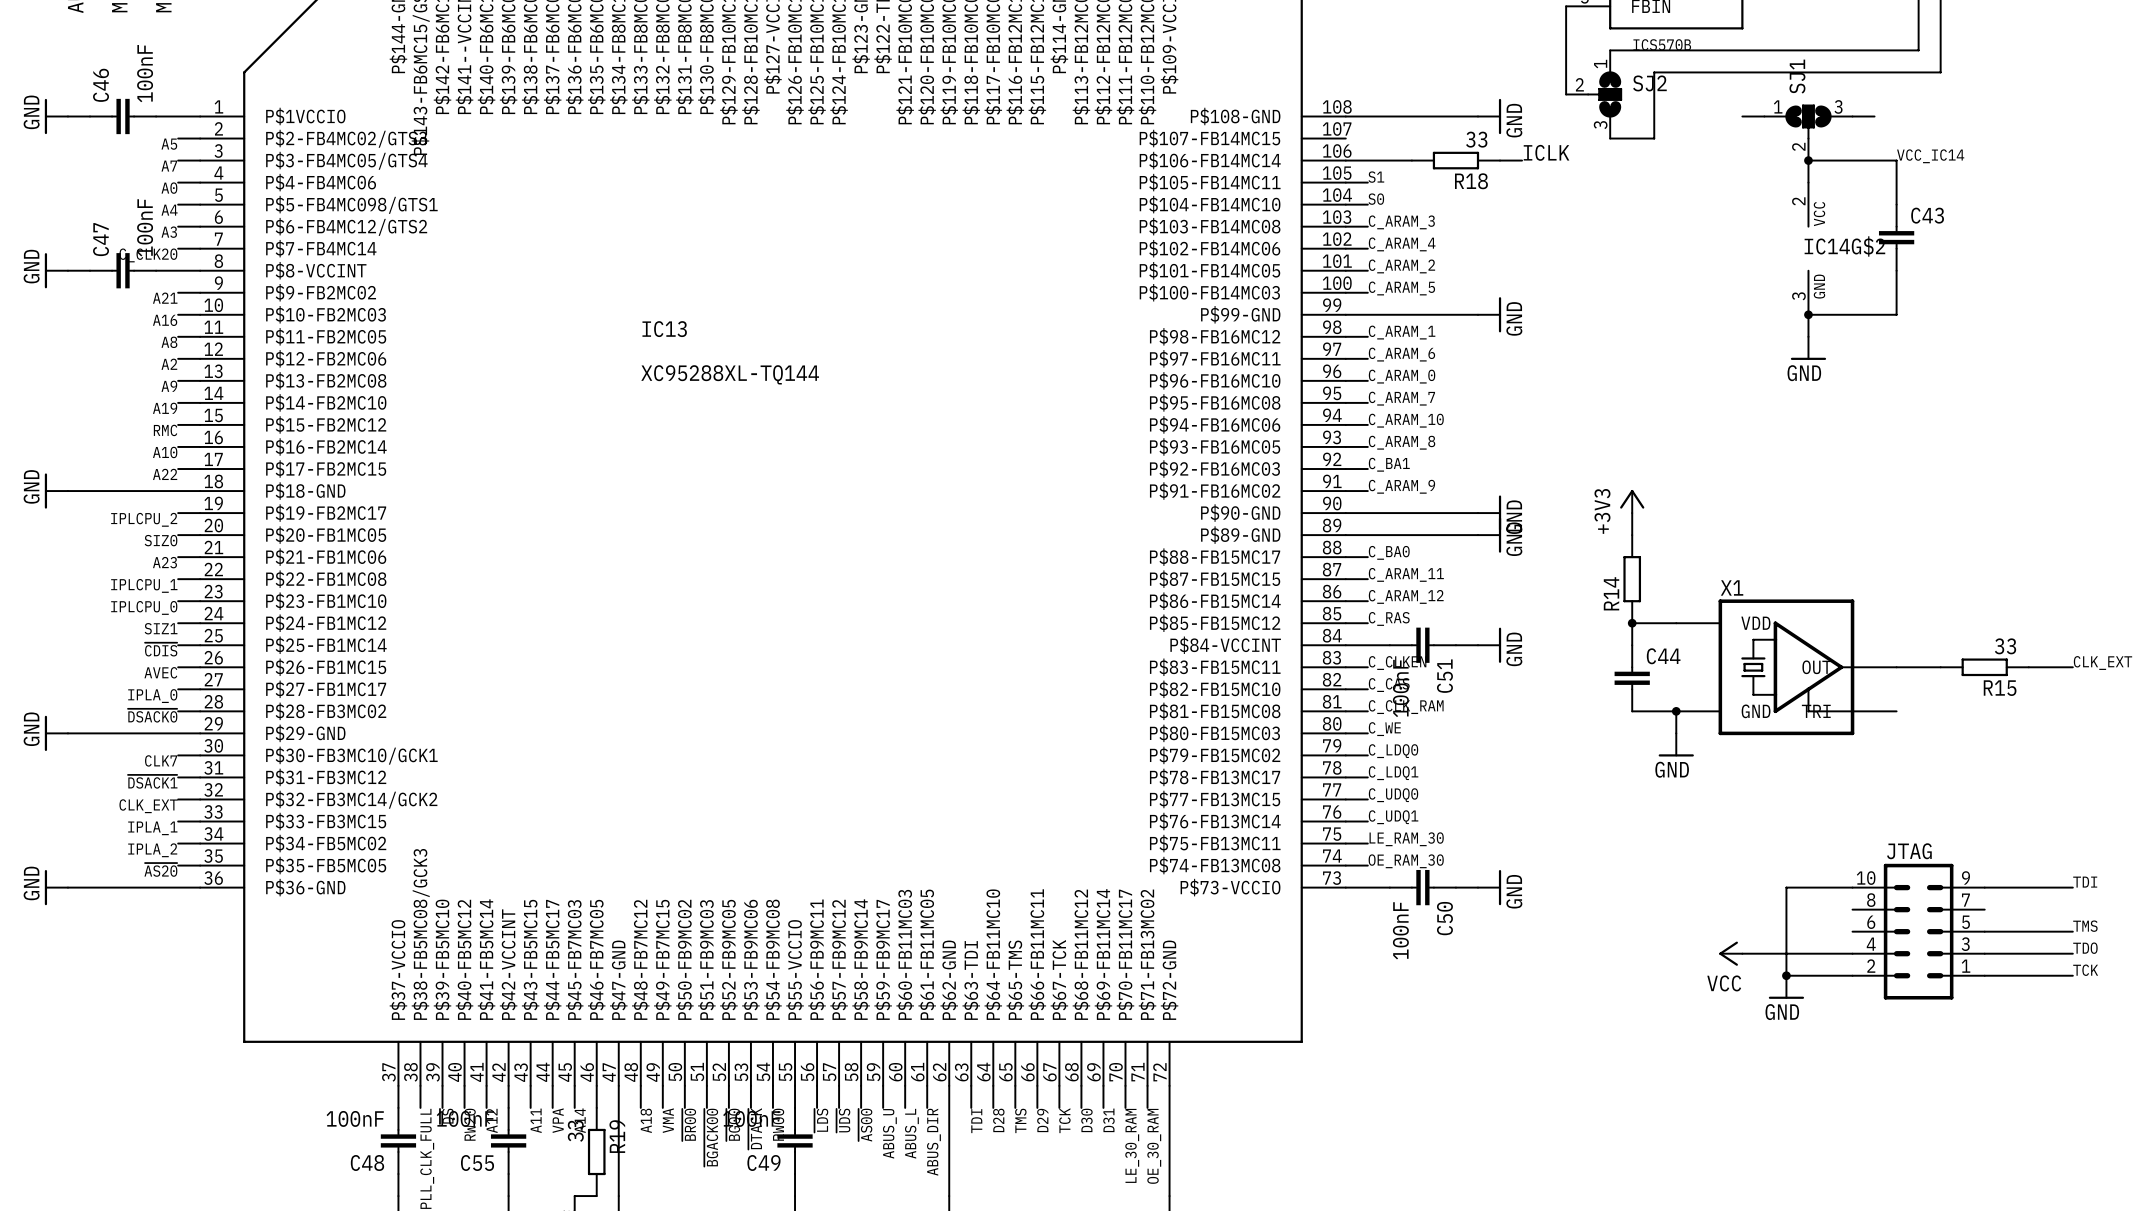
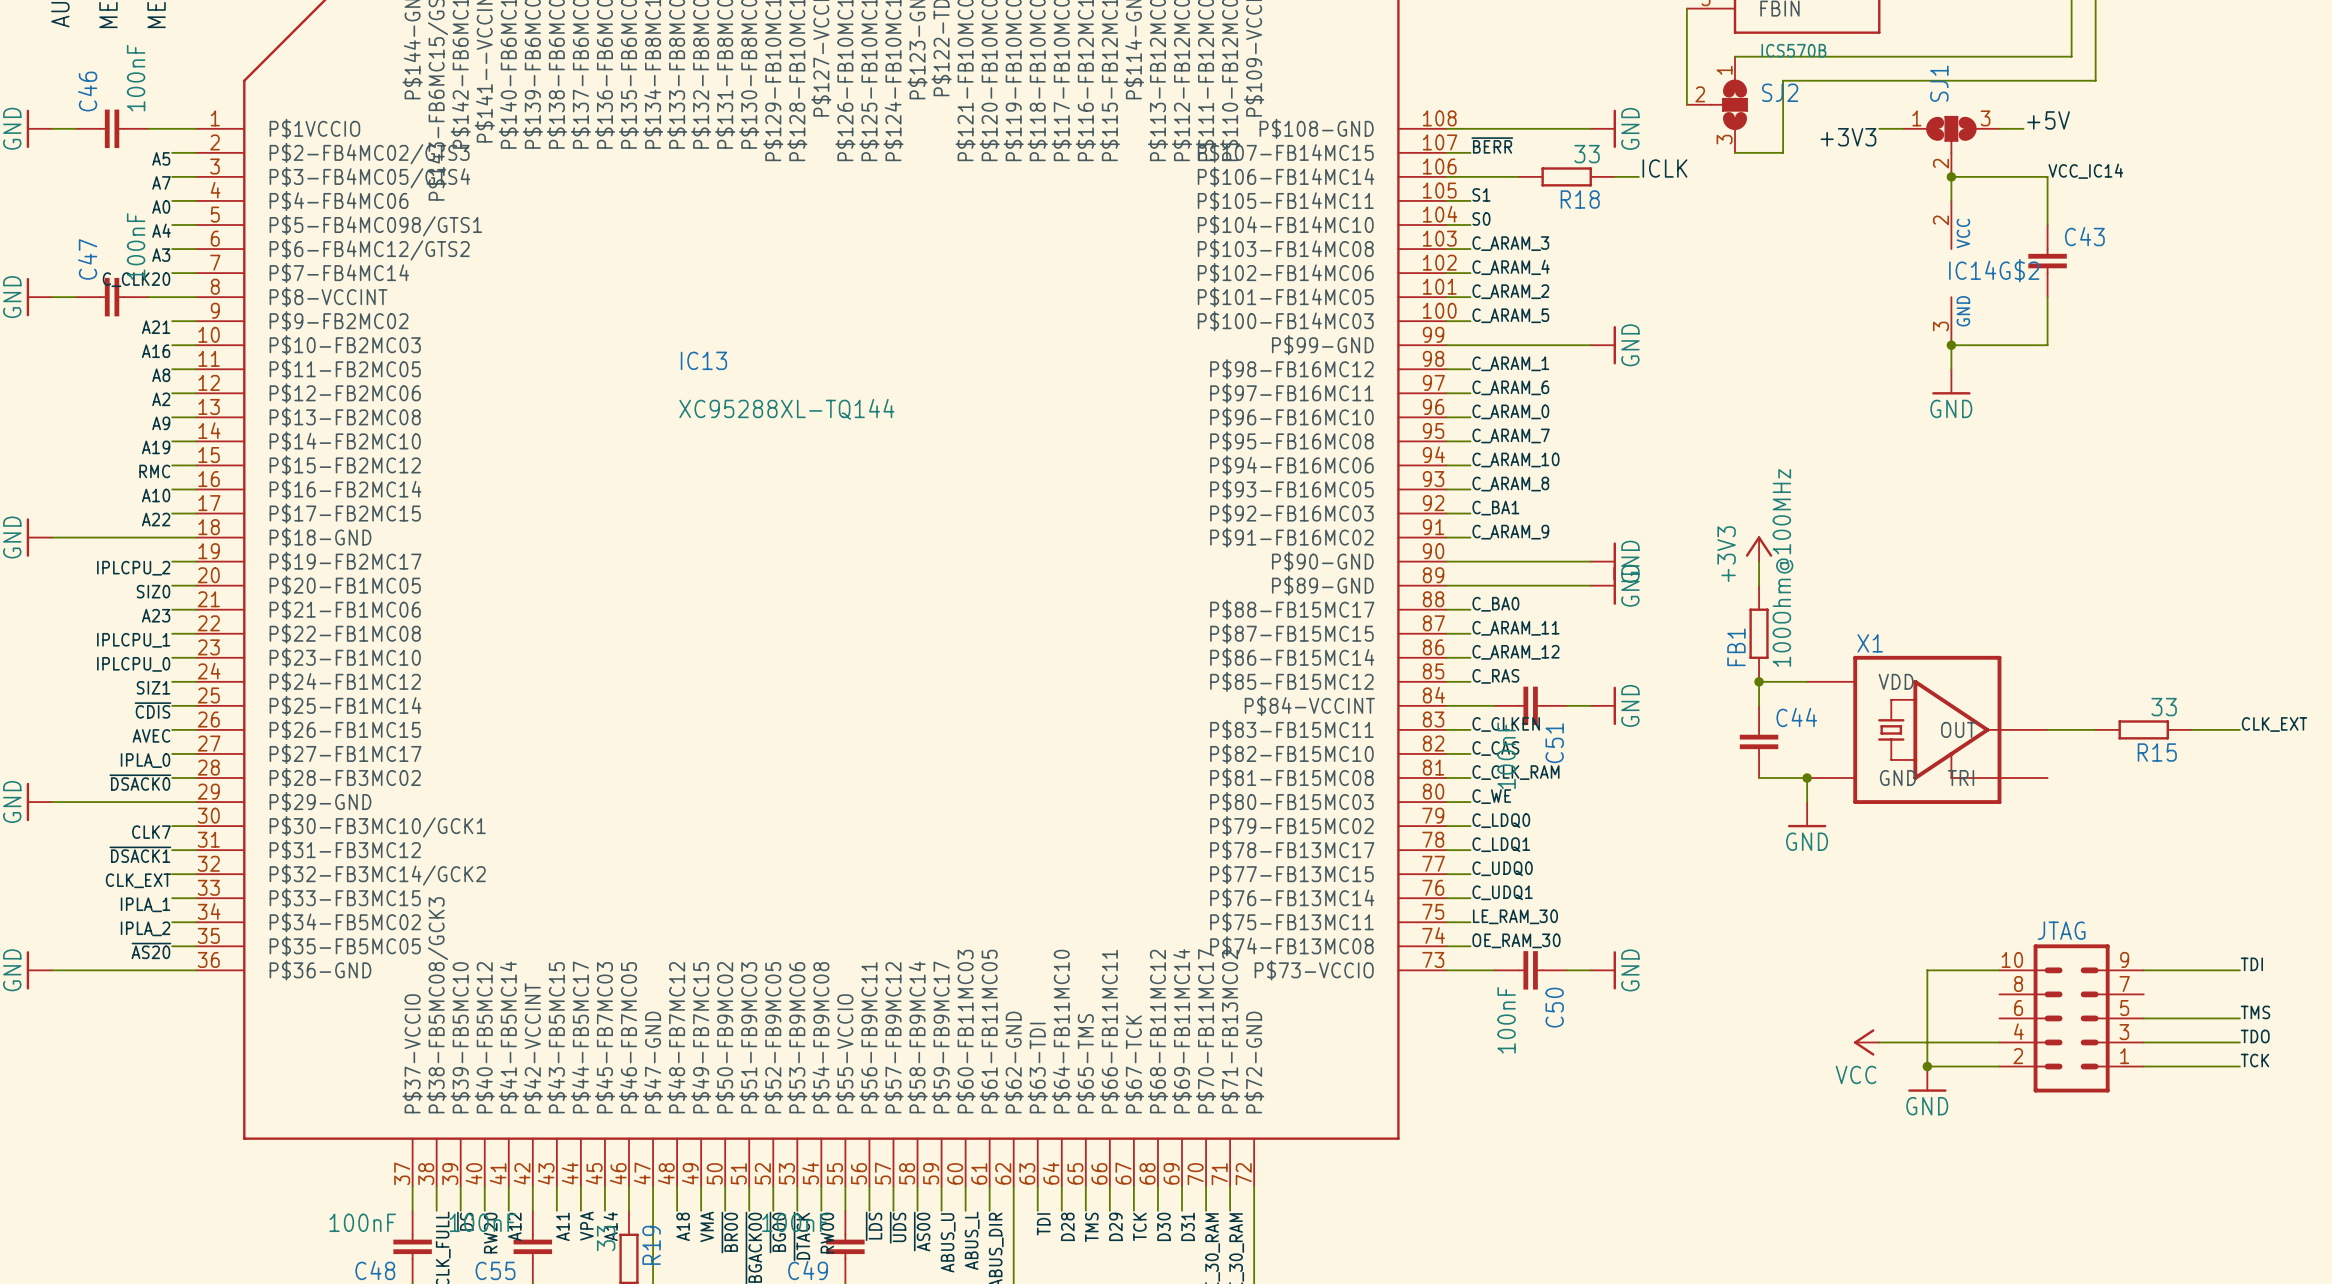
label: none -> +5V (2048, 120)
label: none -> +3V3 (1848, 137)
label: none -> ~{BERR} (1492, 145)
wire: none -> (1446, 152) (1470, 152)
R14 value: none -> 100Ohm@100MHz (1783, 567)
R14 name: R14 (1611, 593) -> FB1 (1736, 647)

